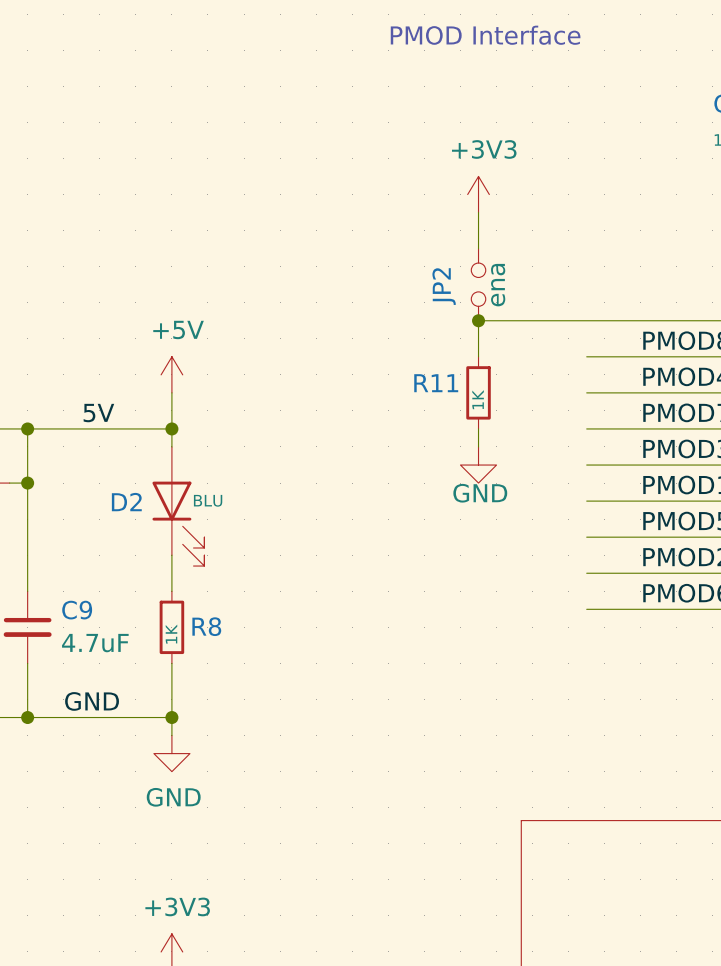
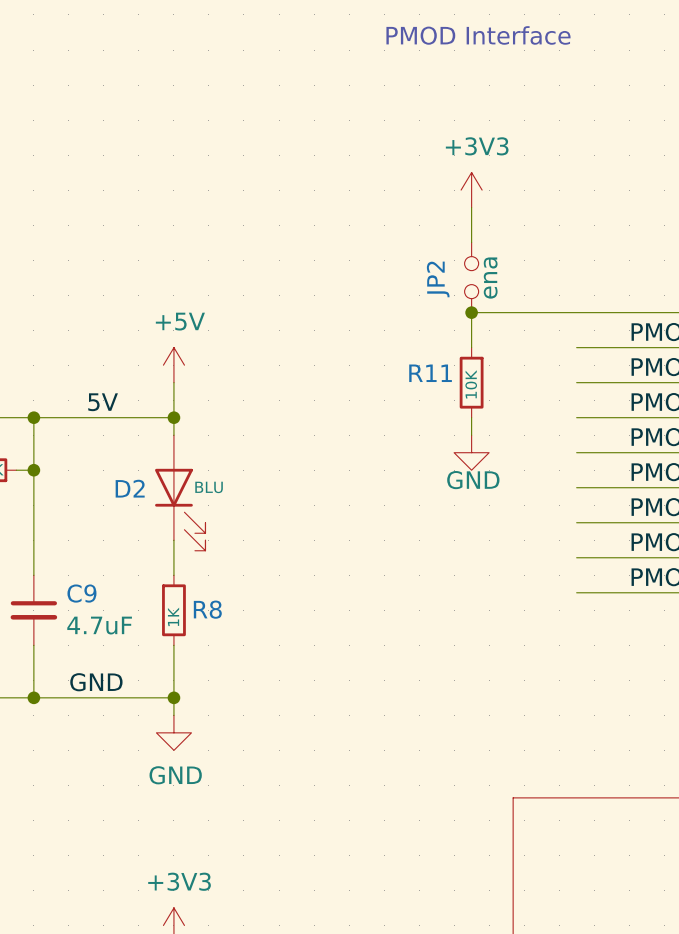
R11 value: 1K (478, 399) -> 10K (471, 384)

